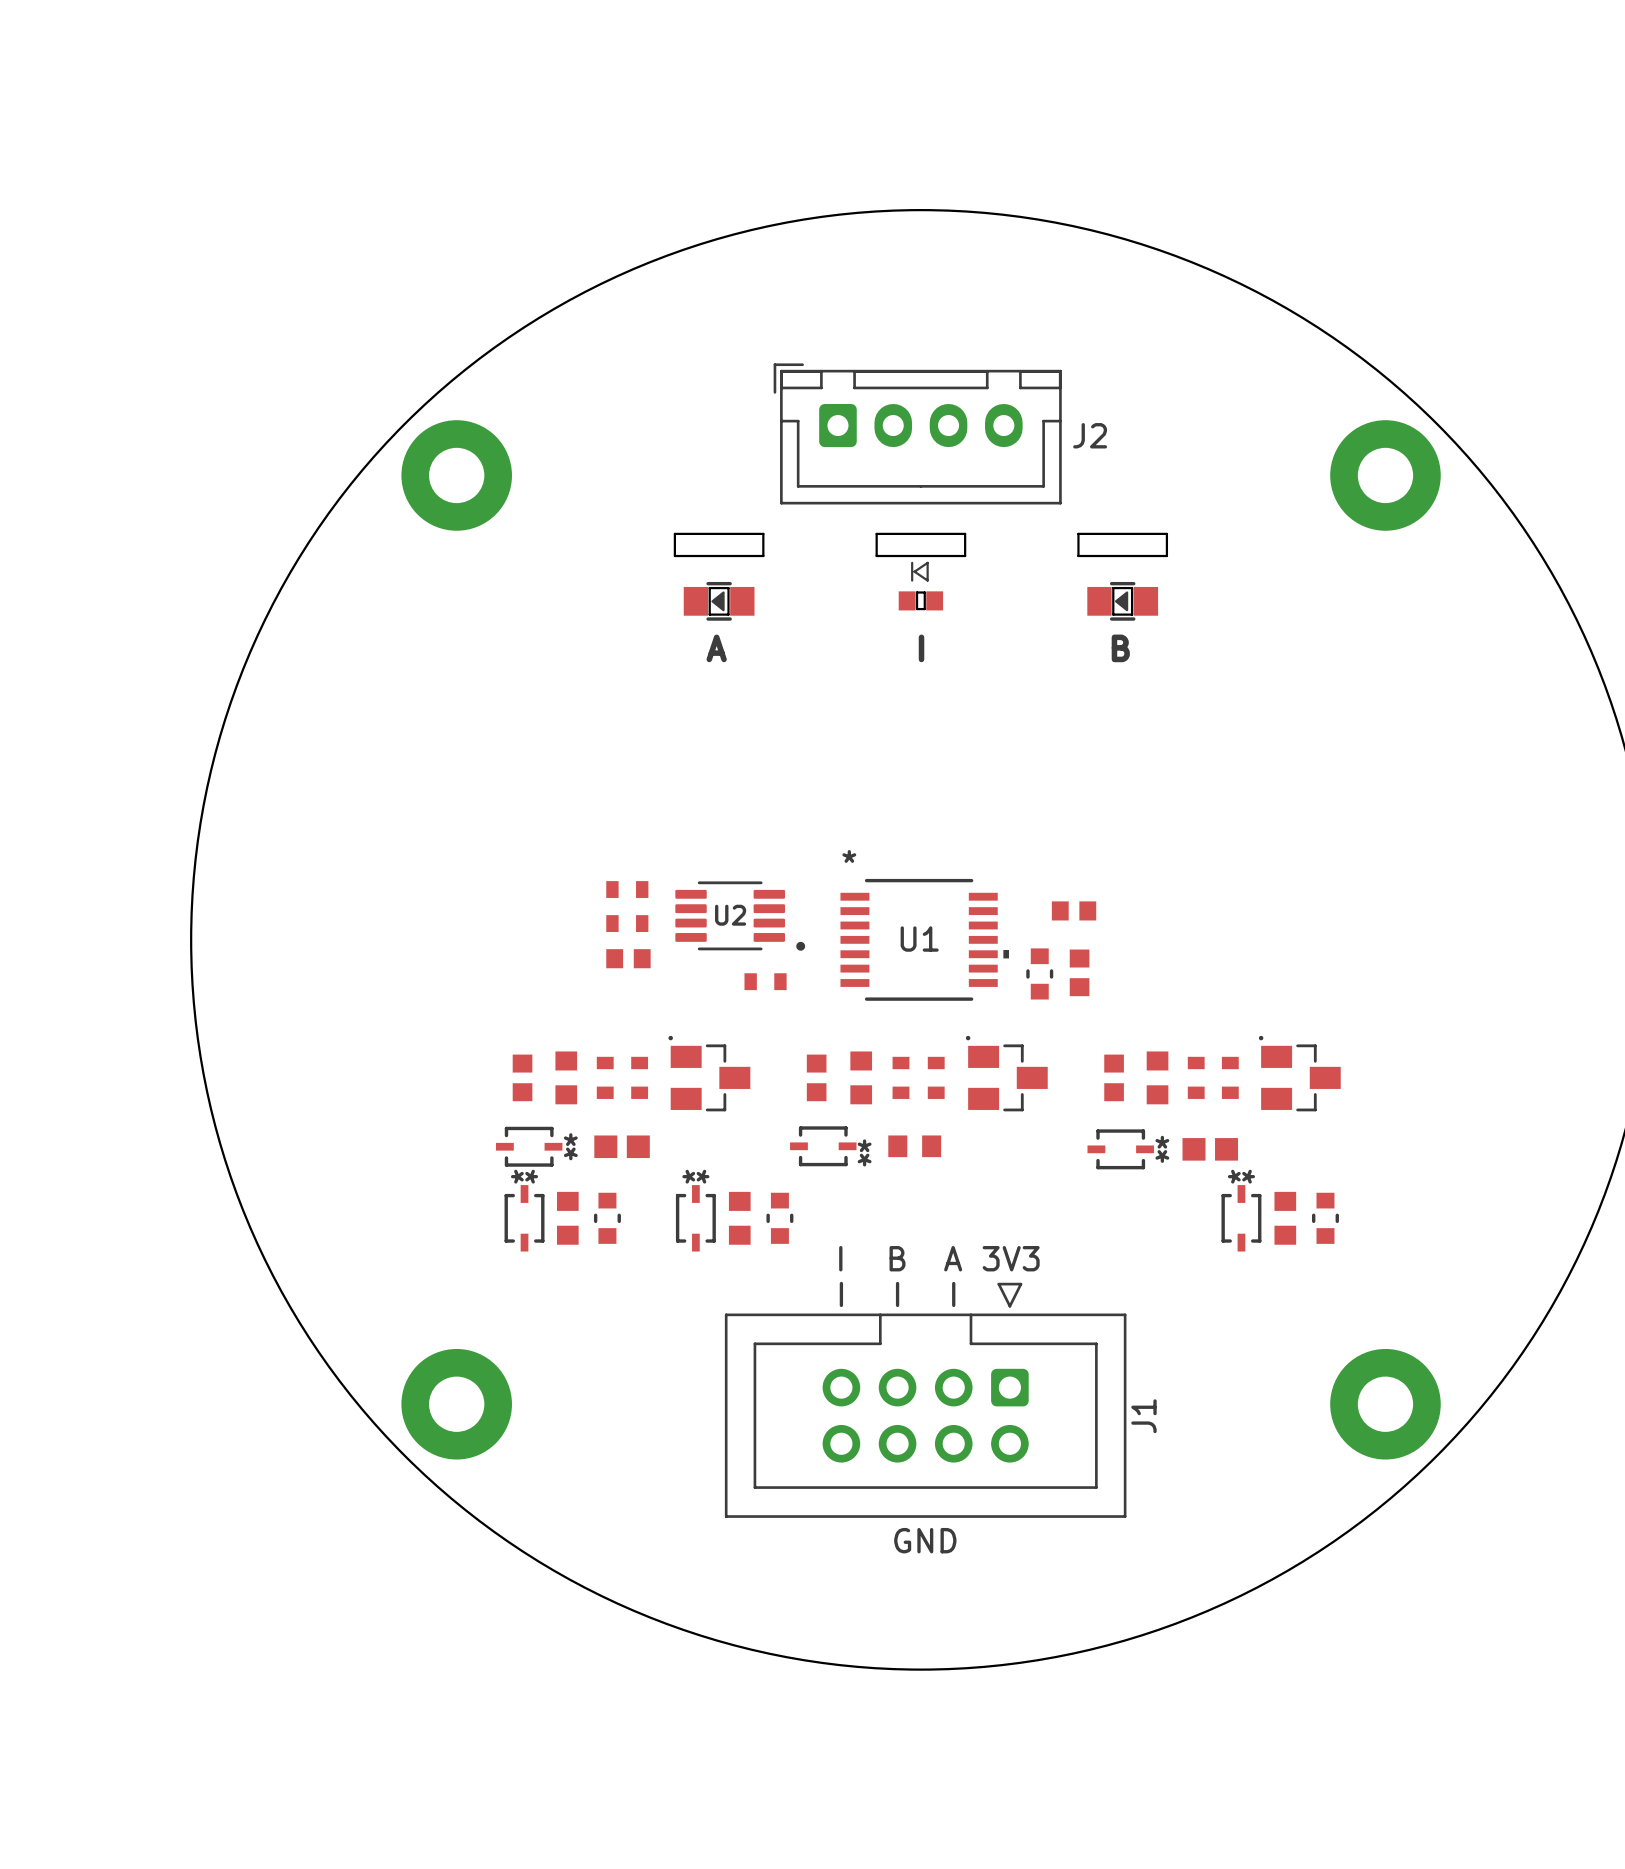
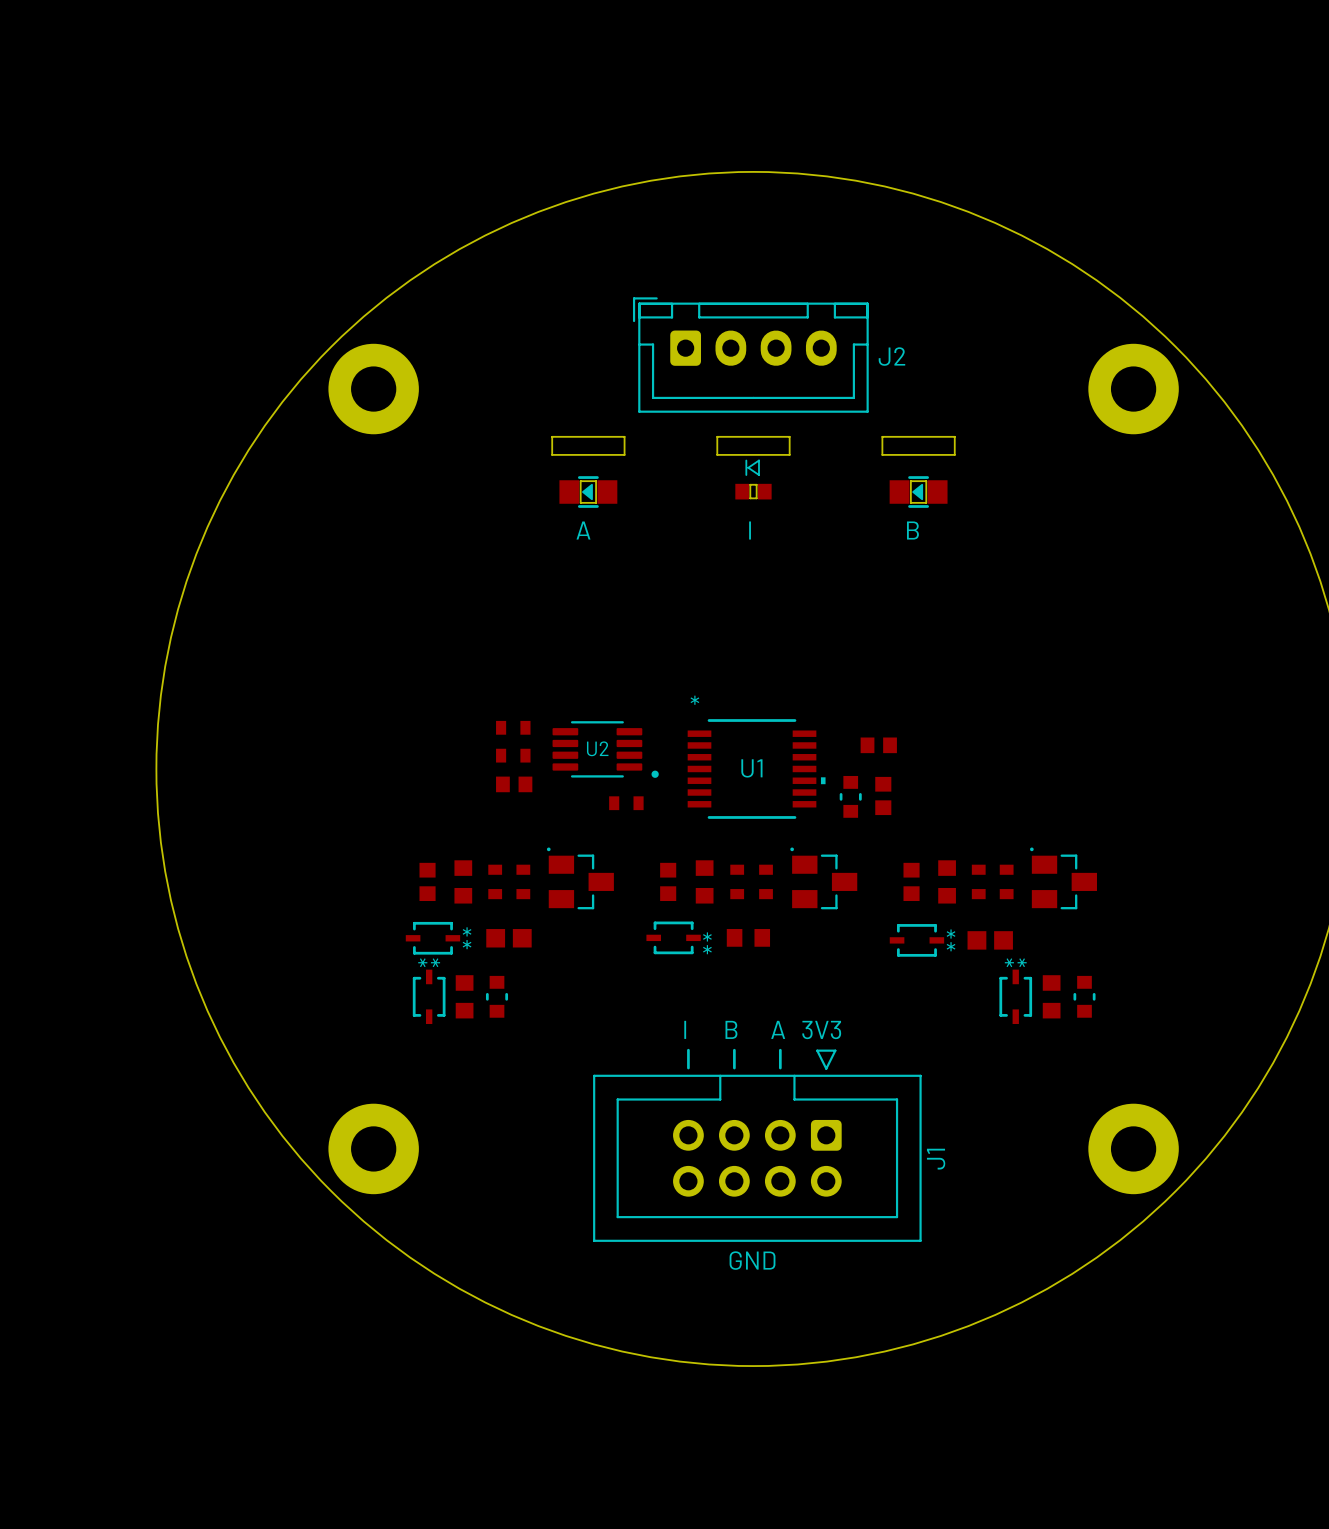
part: (695, 1218) -> none
part: (739, 1218) -> none
part: (779, 1218) -> none

